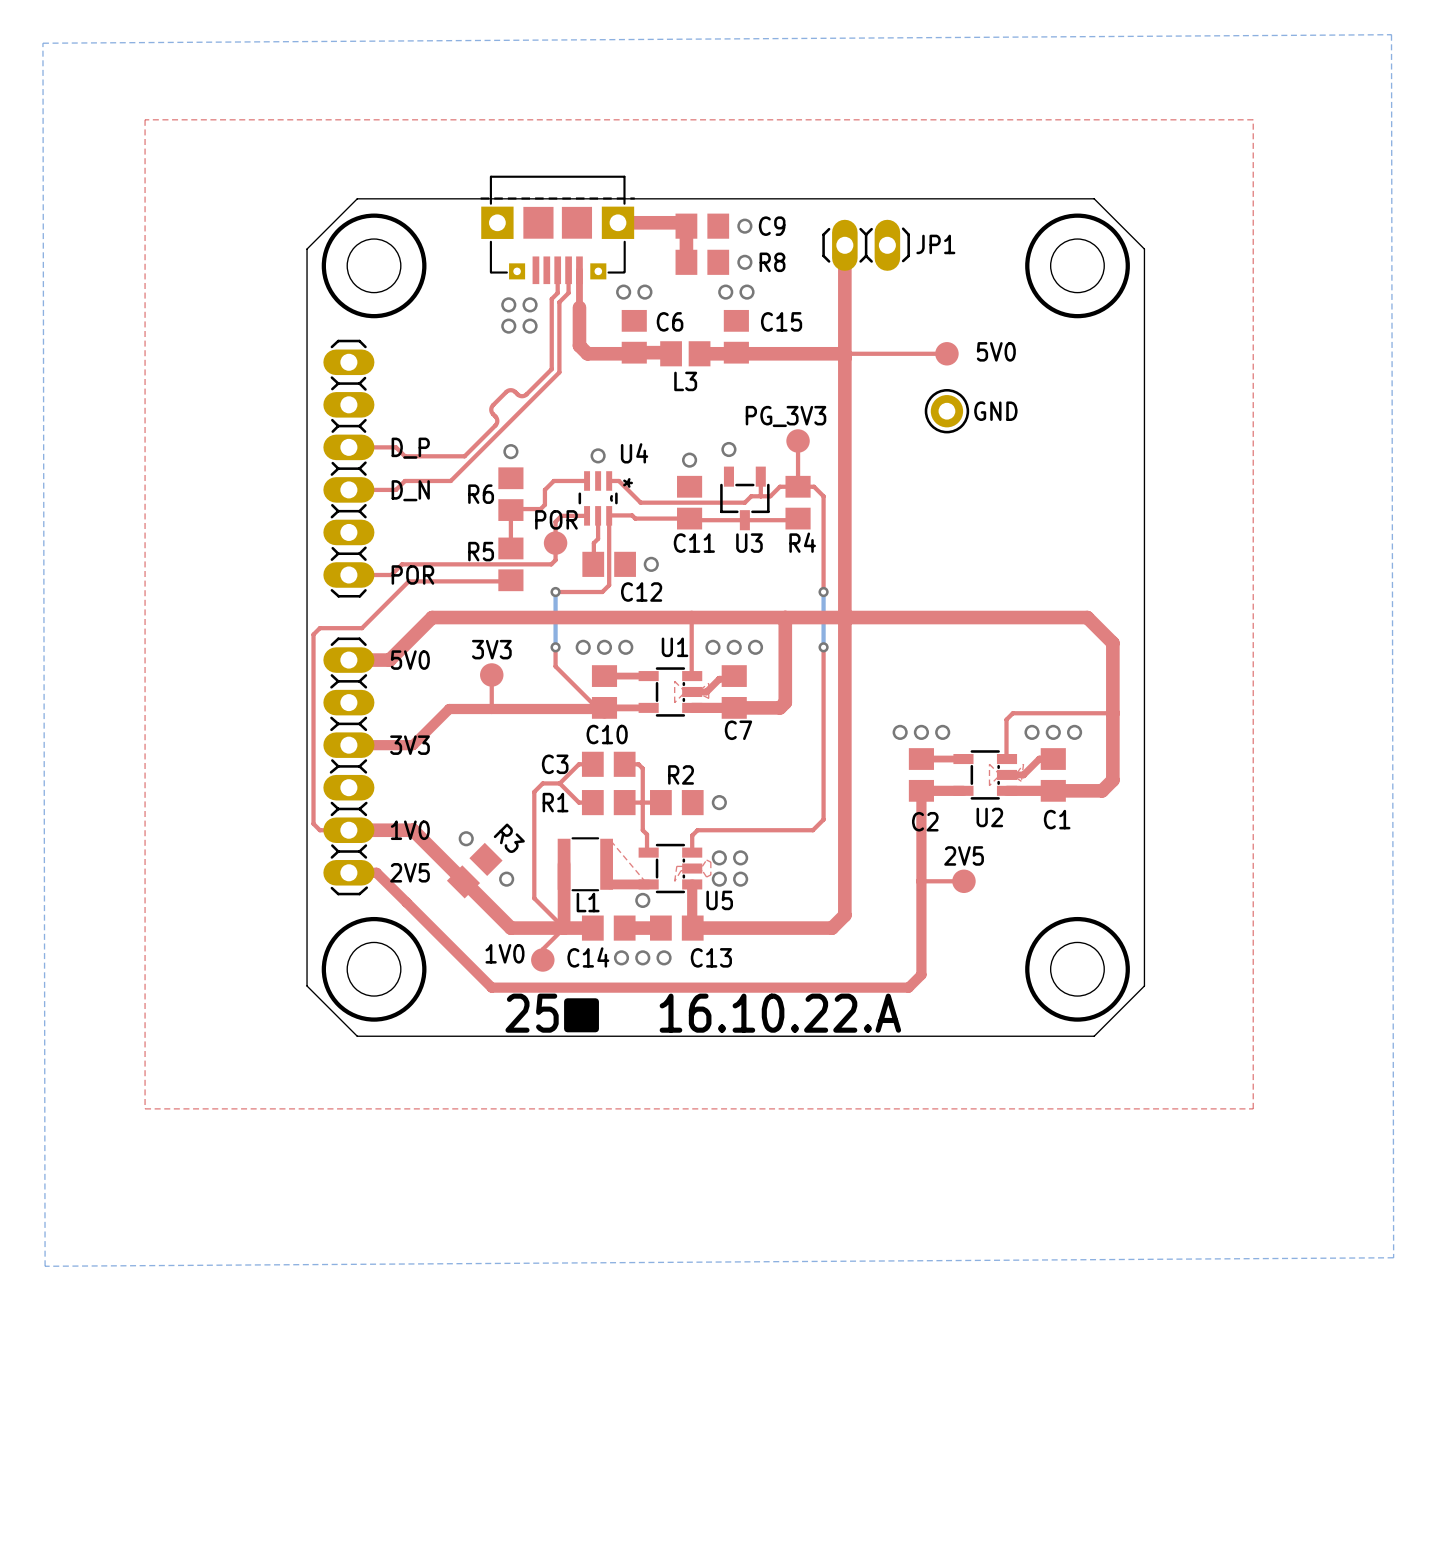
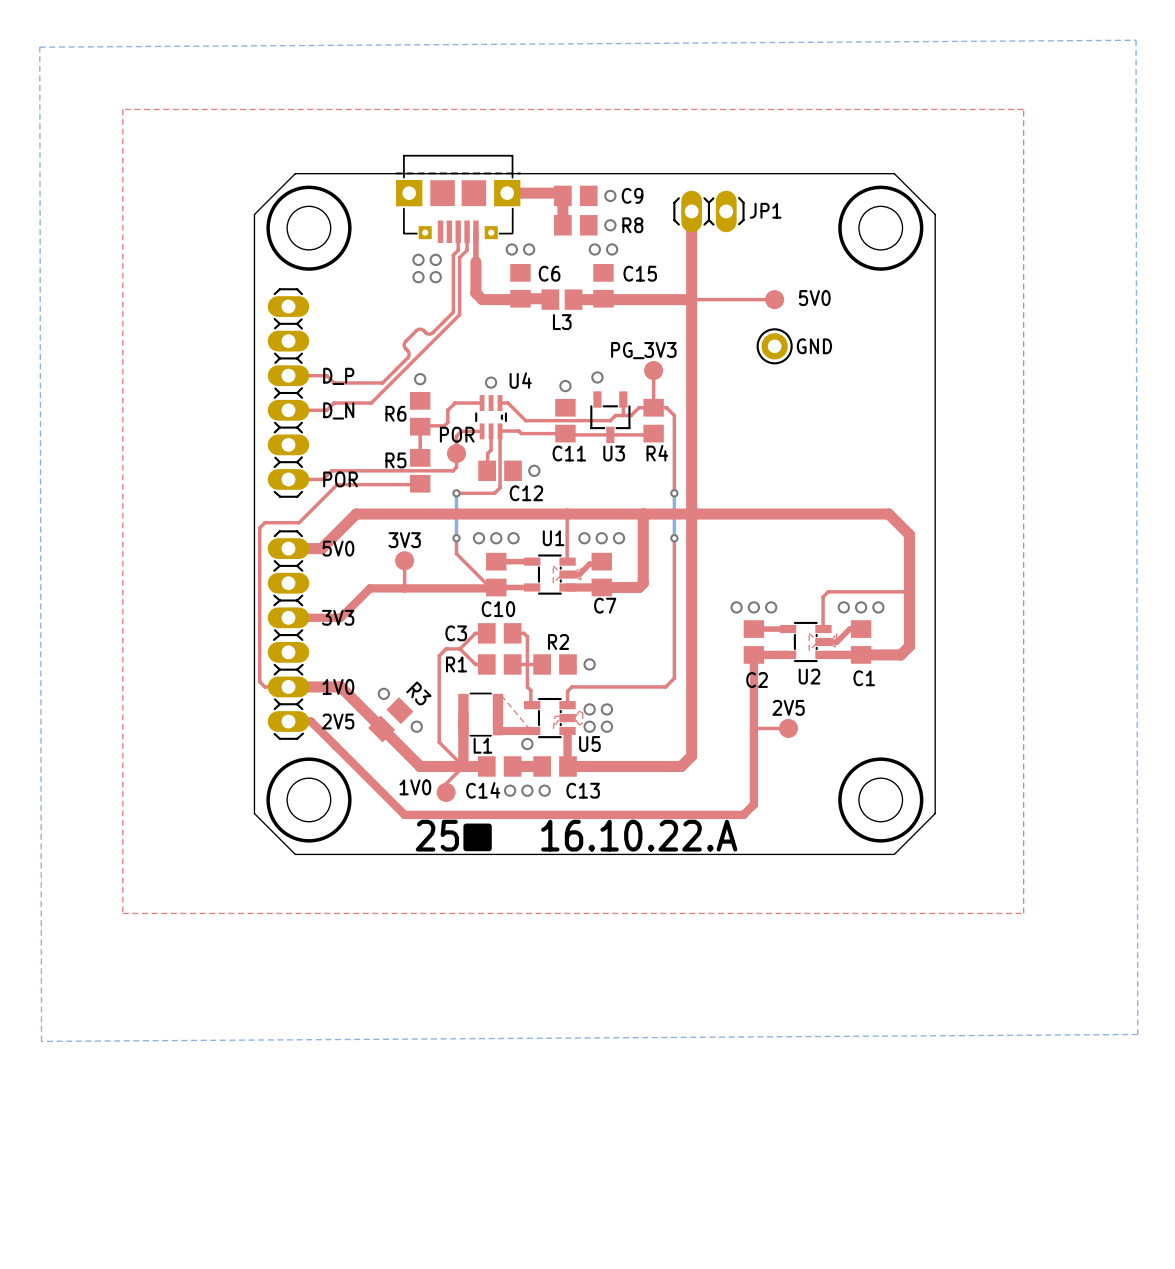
U4 text: * (628, 482) -> none

